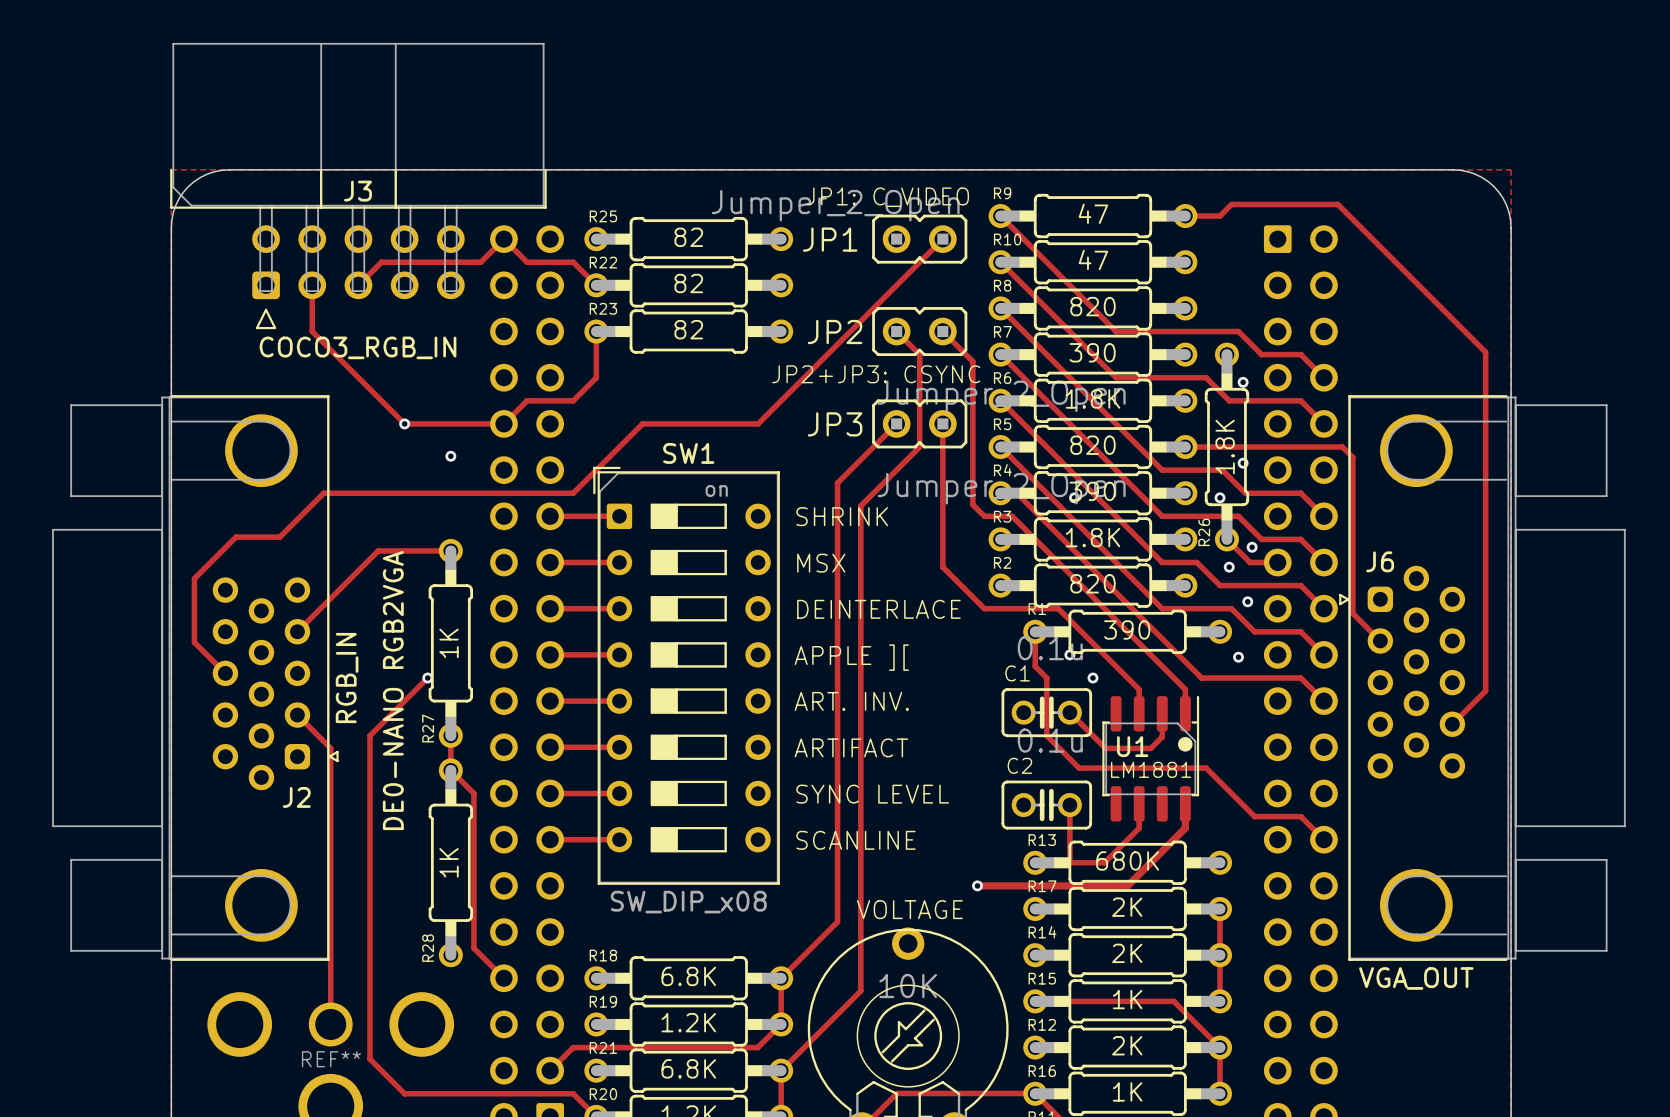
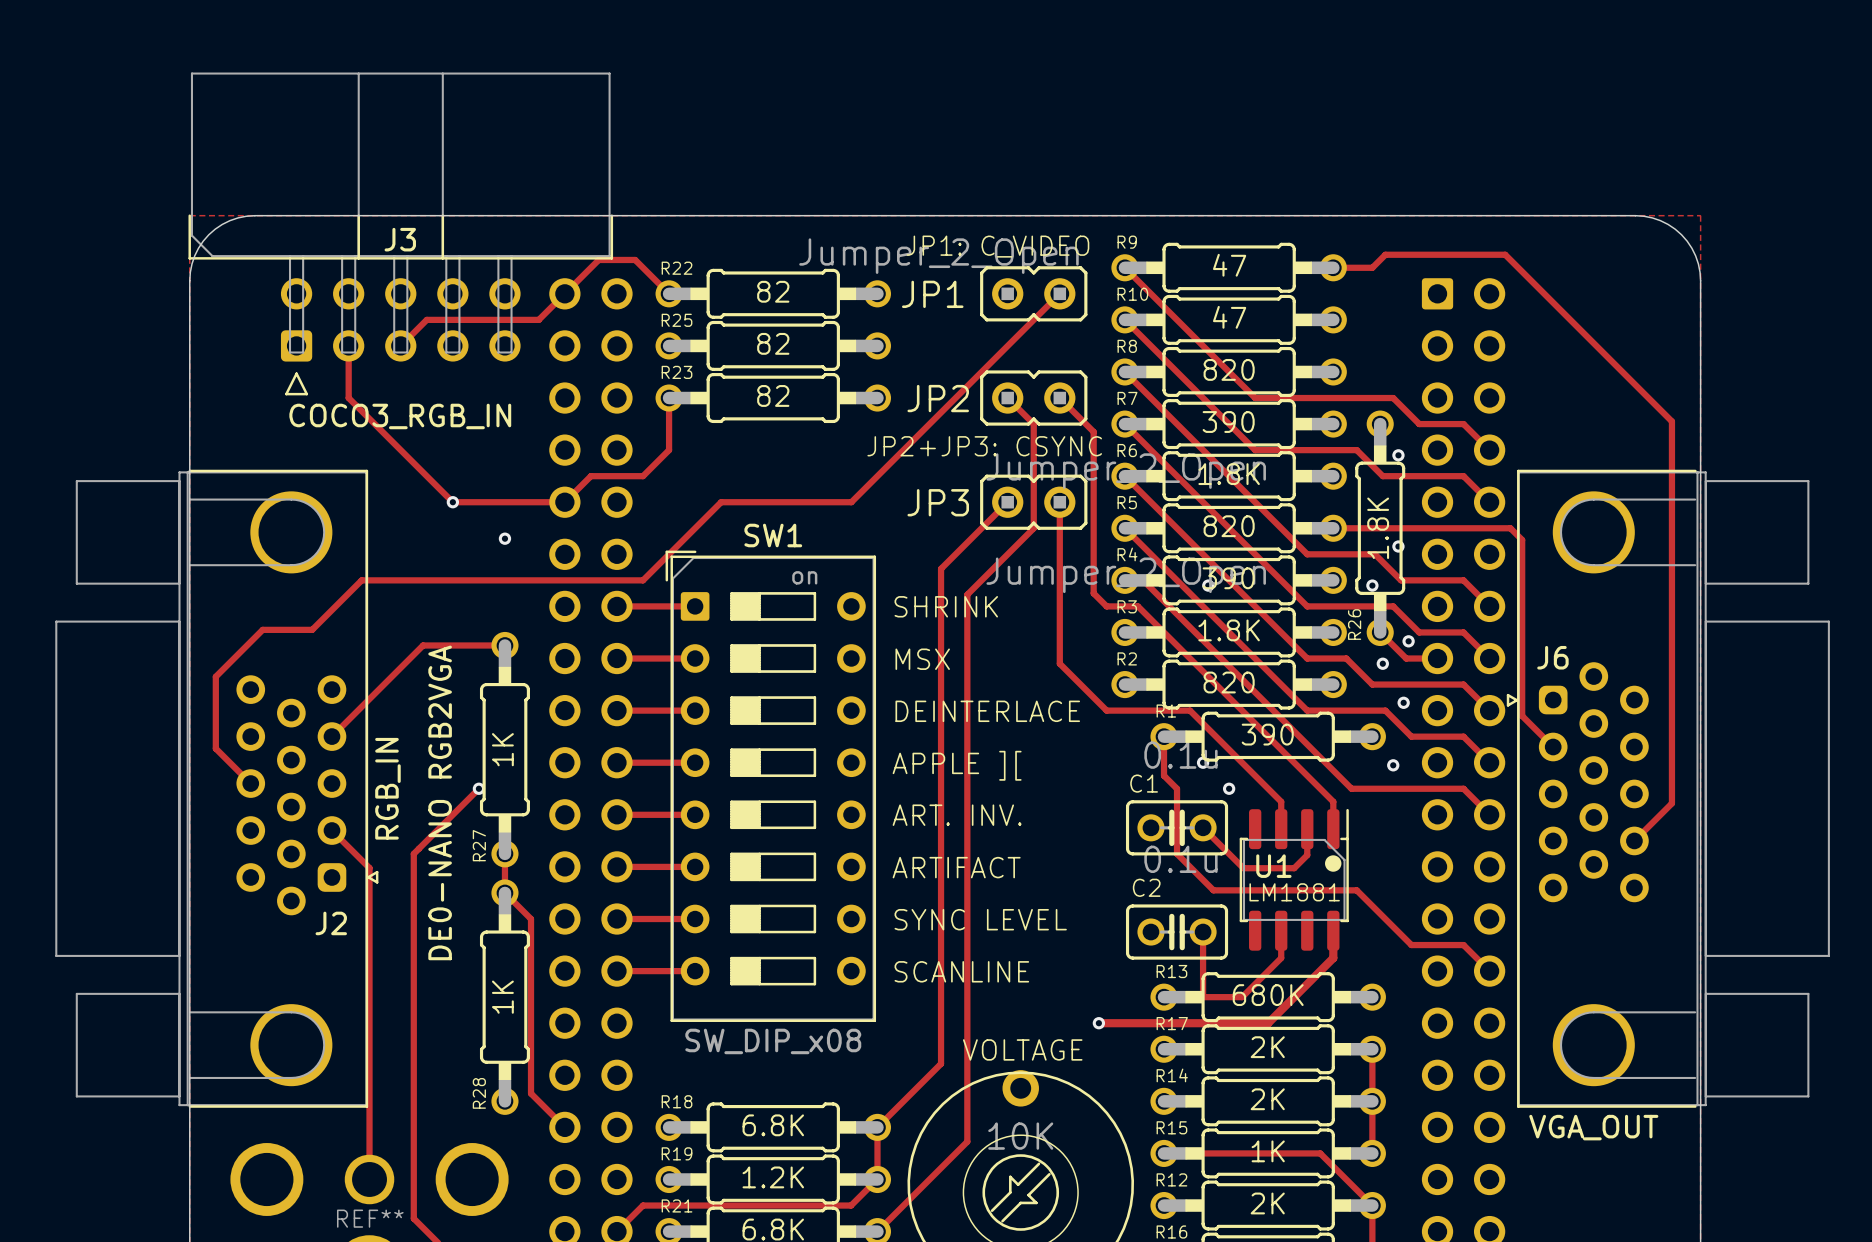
R25 name: R25 (603, 216) -> R22 (677, 268)
track: (503, 239) (527, 262) (573, 262) (596, 285) -> (564, 293) (598, 259) (635, 259) (669, 293)
R22 name: R22 (603, 262) -> R25 (677, 320)

